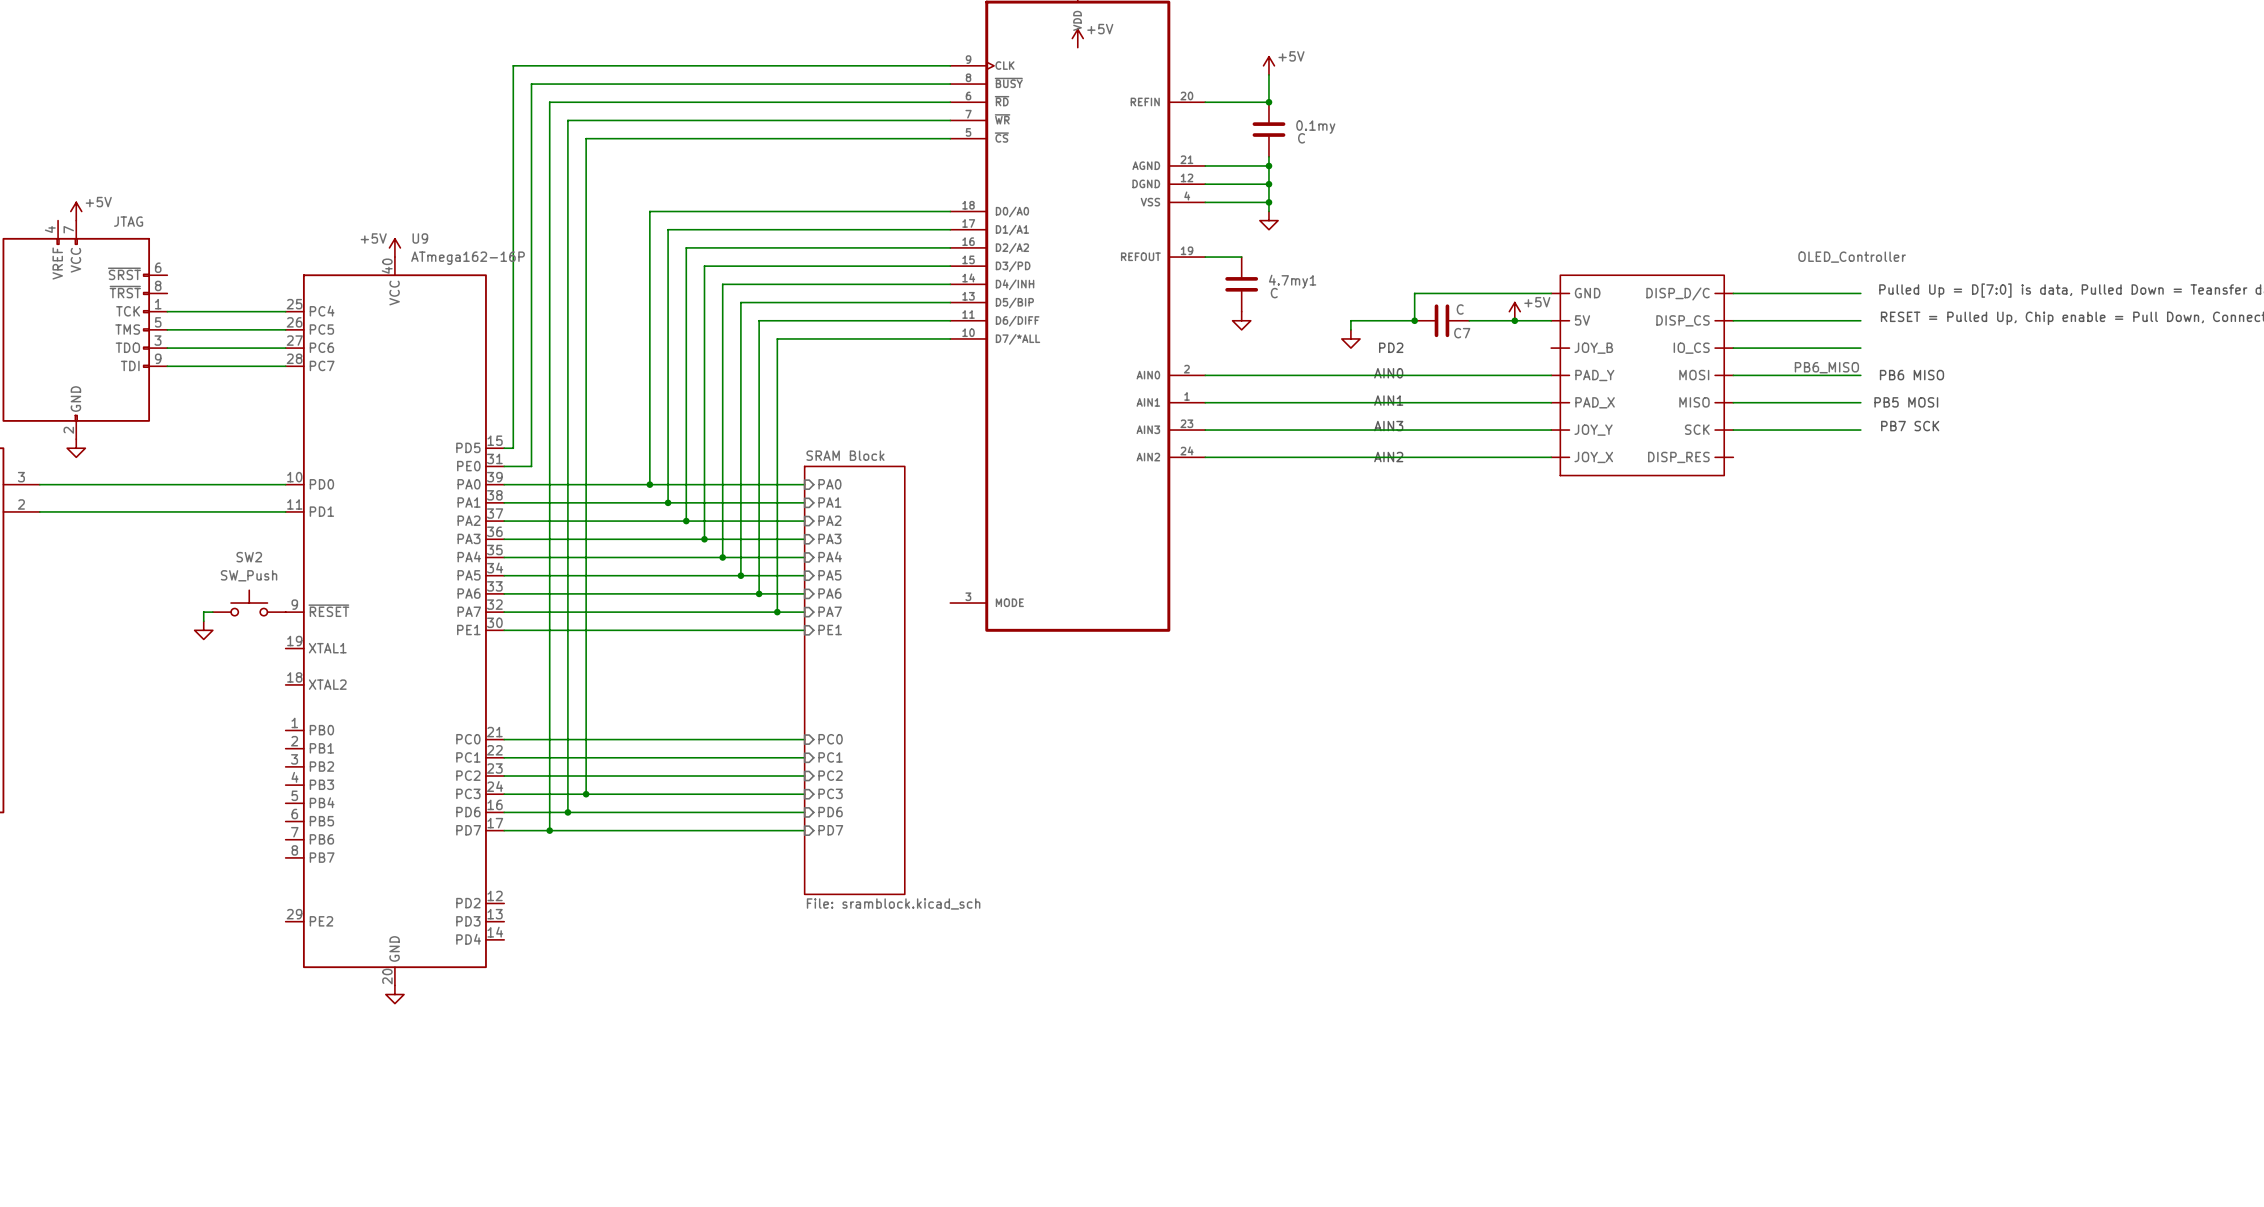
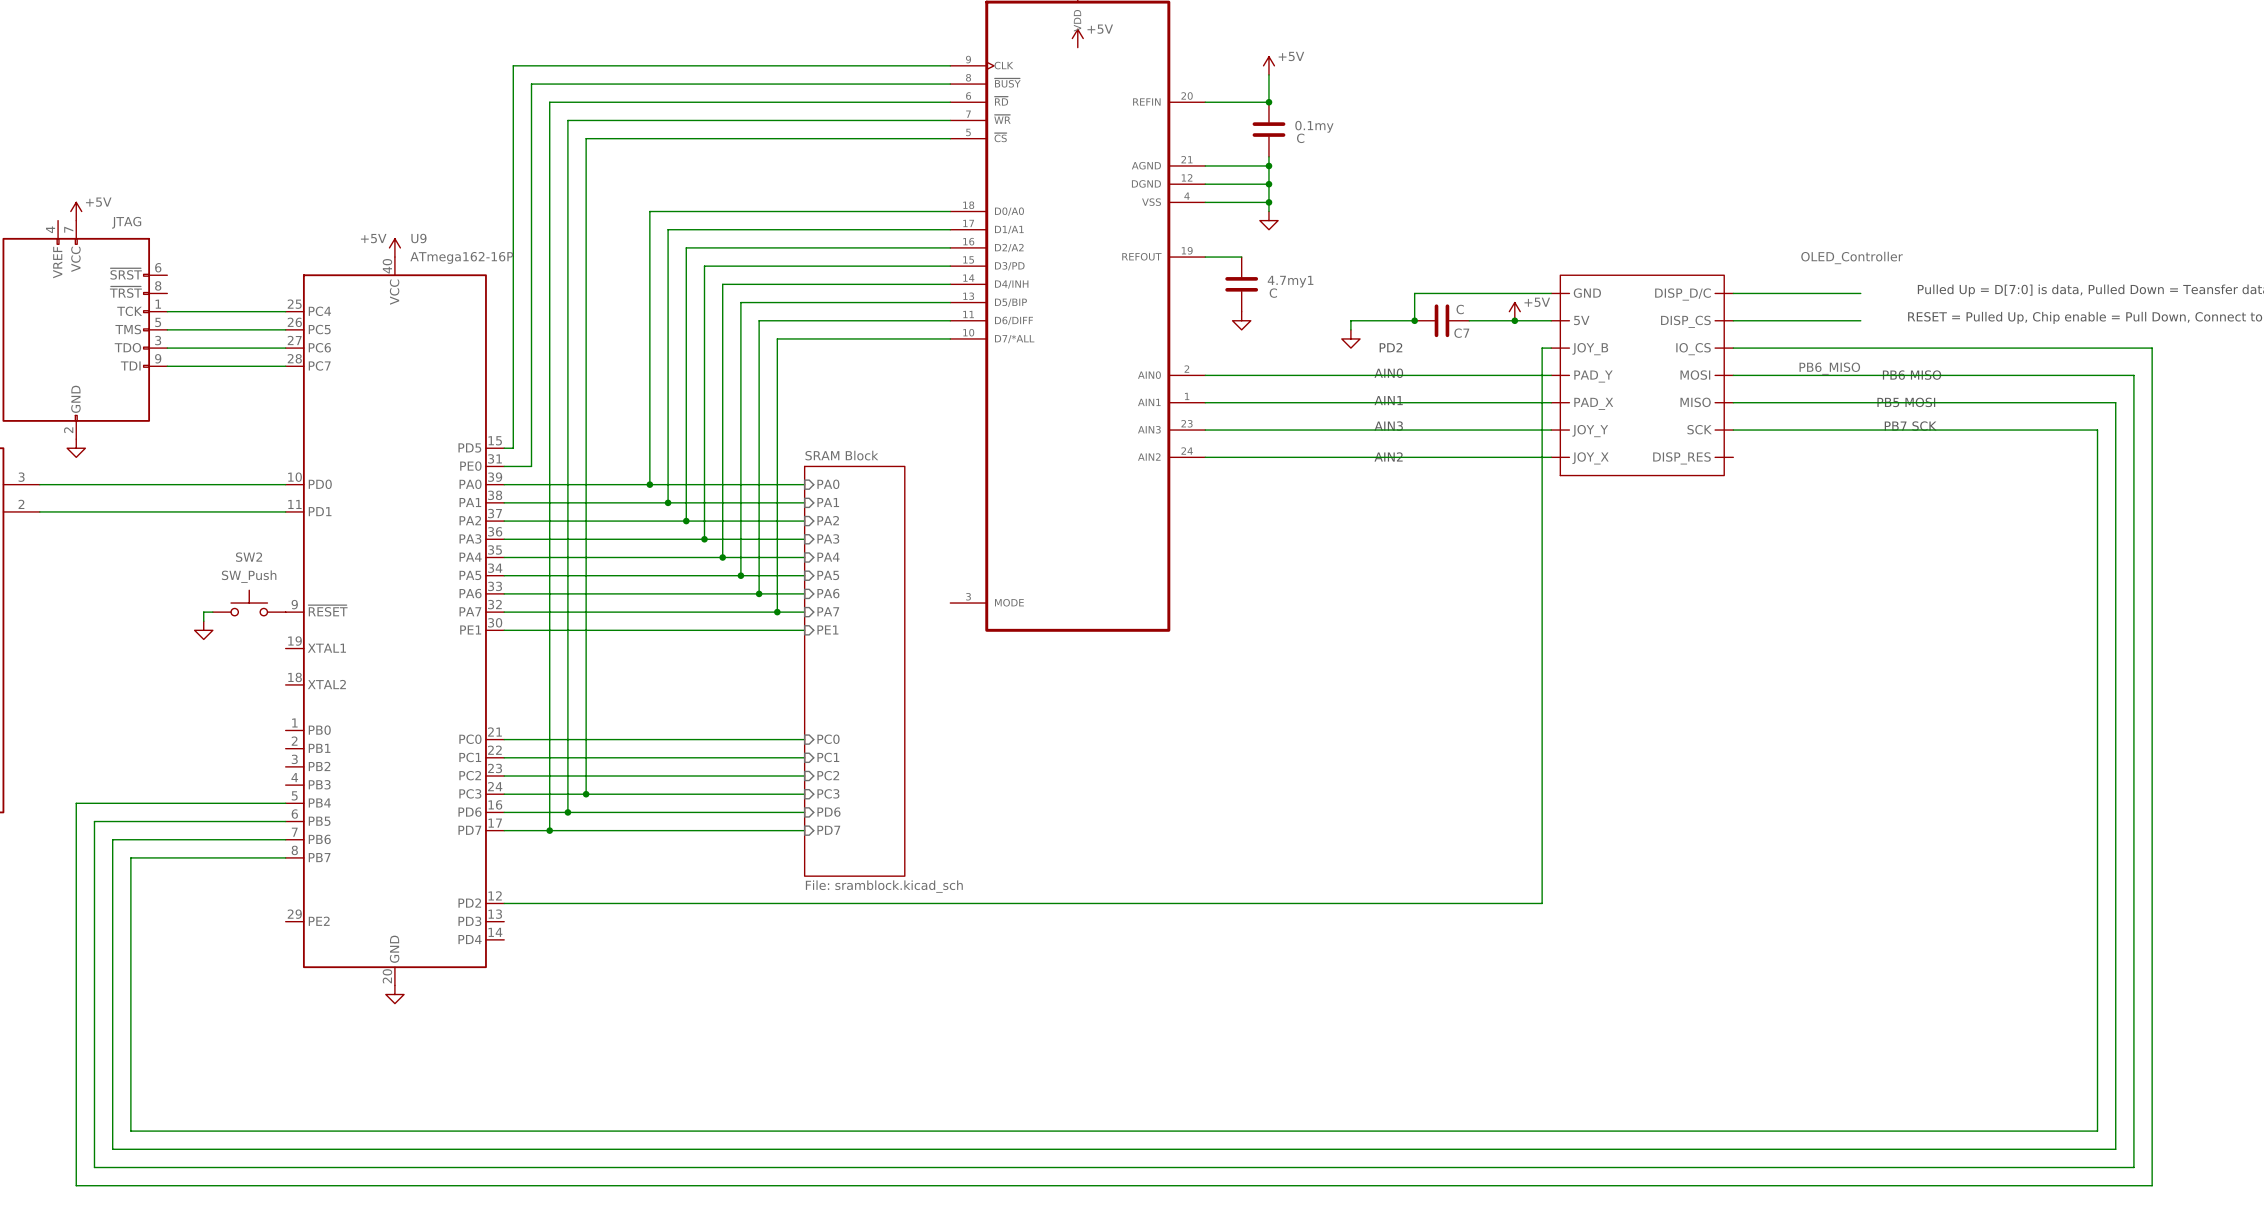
wire: none -> (1551, 348) (1542, 348) (1542, 903) (504, 903)
wire: none -> (1860, 348) (2152, 348) (2152, 1185) (76, 1185) (76, 803) (285, 803)
wire: none -> (1860, 375) (2133, 375) (2133, 1167) (94, 1167) (94, 821) (285, 821)
wire: none -> (1860, 402) (2115, 402) (2115, 1149) (112, 1149) (112, 839) (285, 839)
wire: none -> (1860, 430) (2097, 430) (2097, 1131) (130, 1131) (130, 857) (285, 857)
sheet SRAM Block: none -> File: sramblock.kicad_sch (854, 671)
sheet SRAM Block: File: sramblock.kicad_sch (854, 680) -> none

